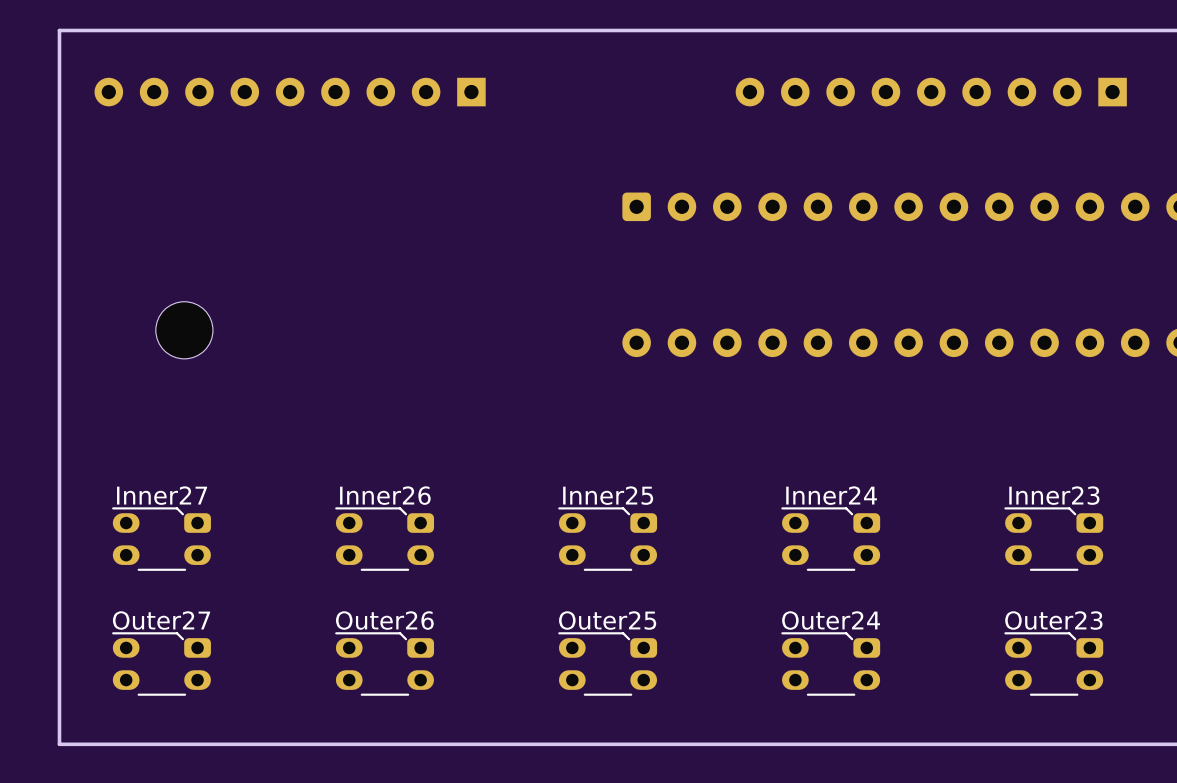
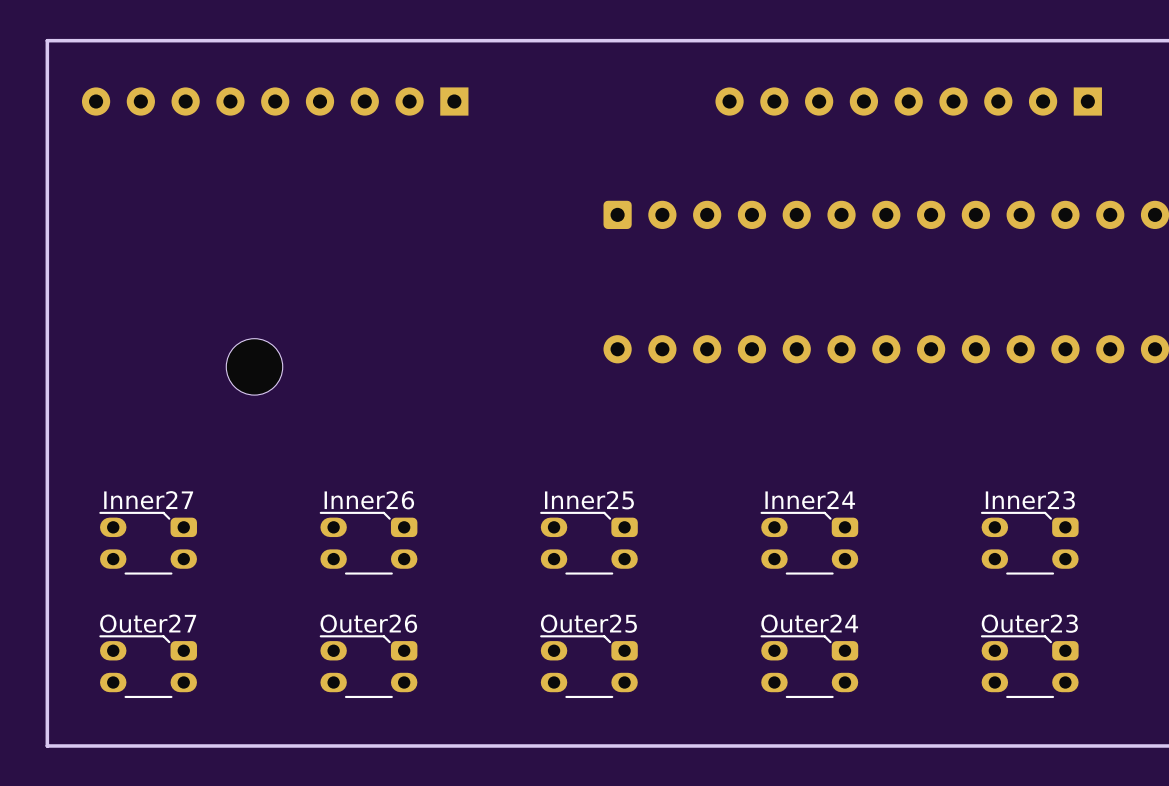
part position: (184, 330) -> (254, 366)

